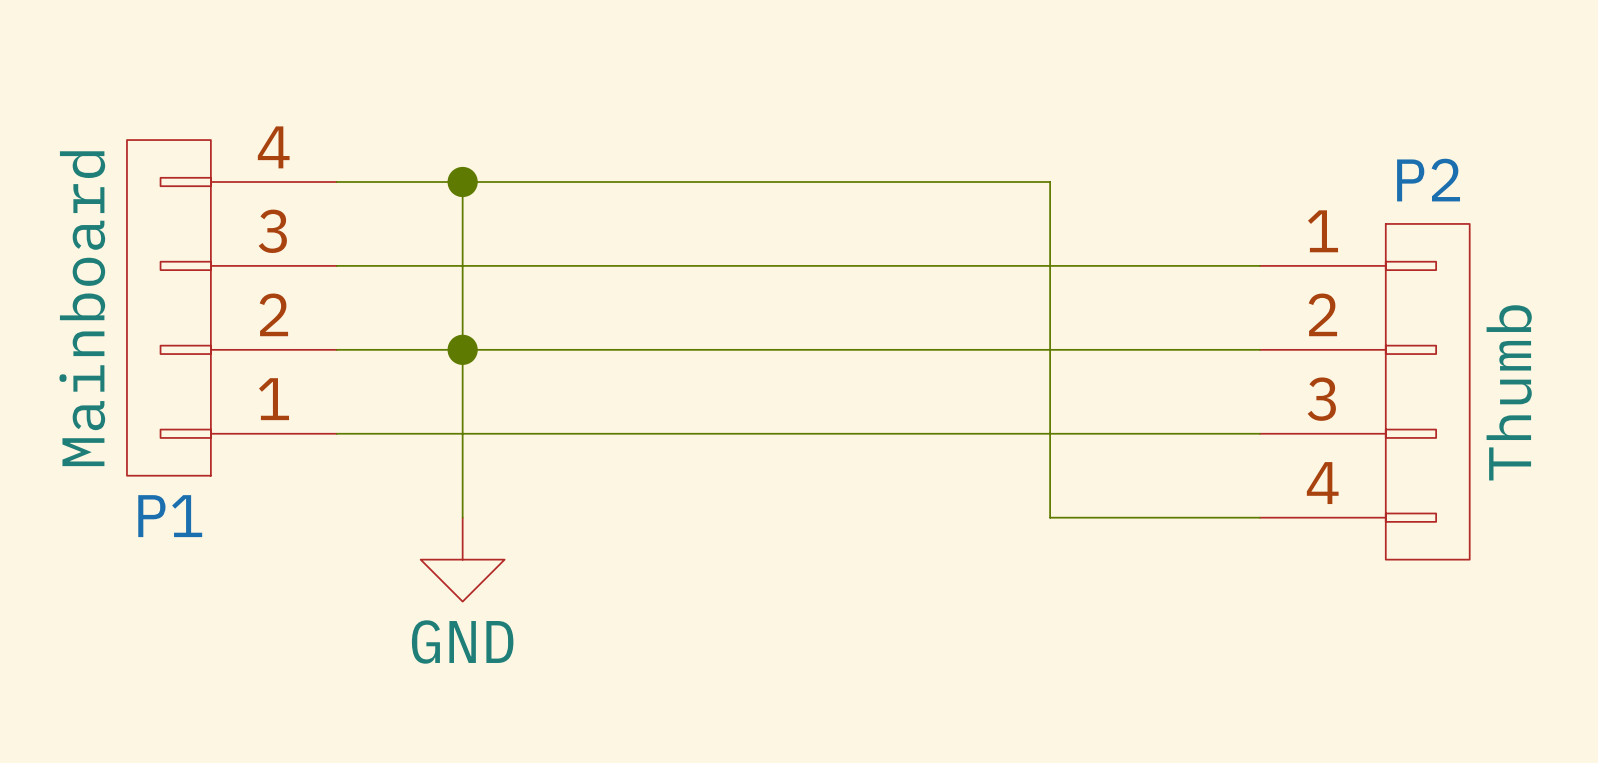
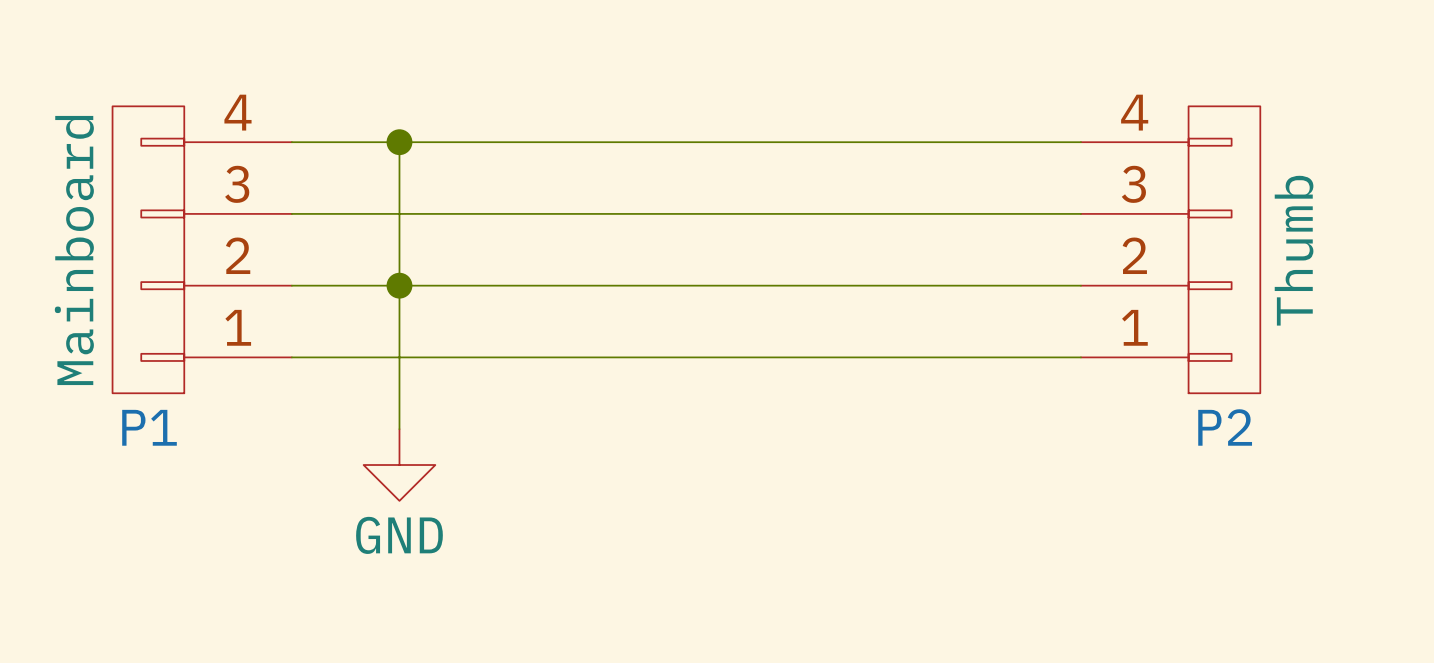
wire: (1050, 182) (1050, 517) (1259, 517) -> (901, 142) (1080, 142)
P2 flip: as is (1427, 391) -> up-down (1224, 249)

